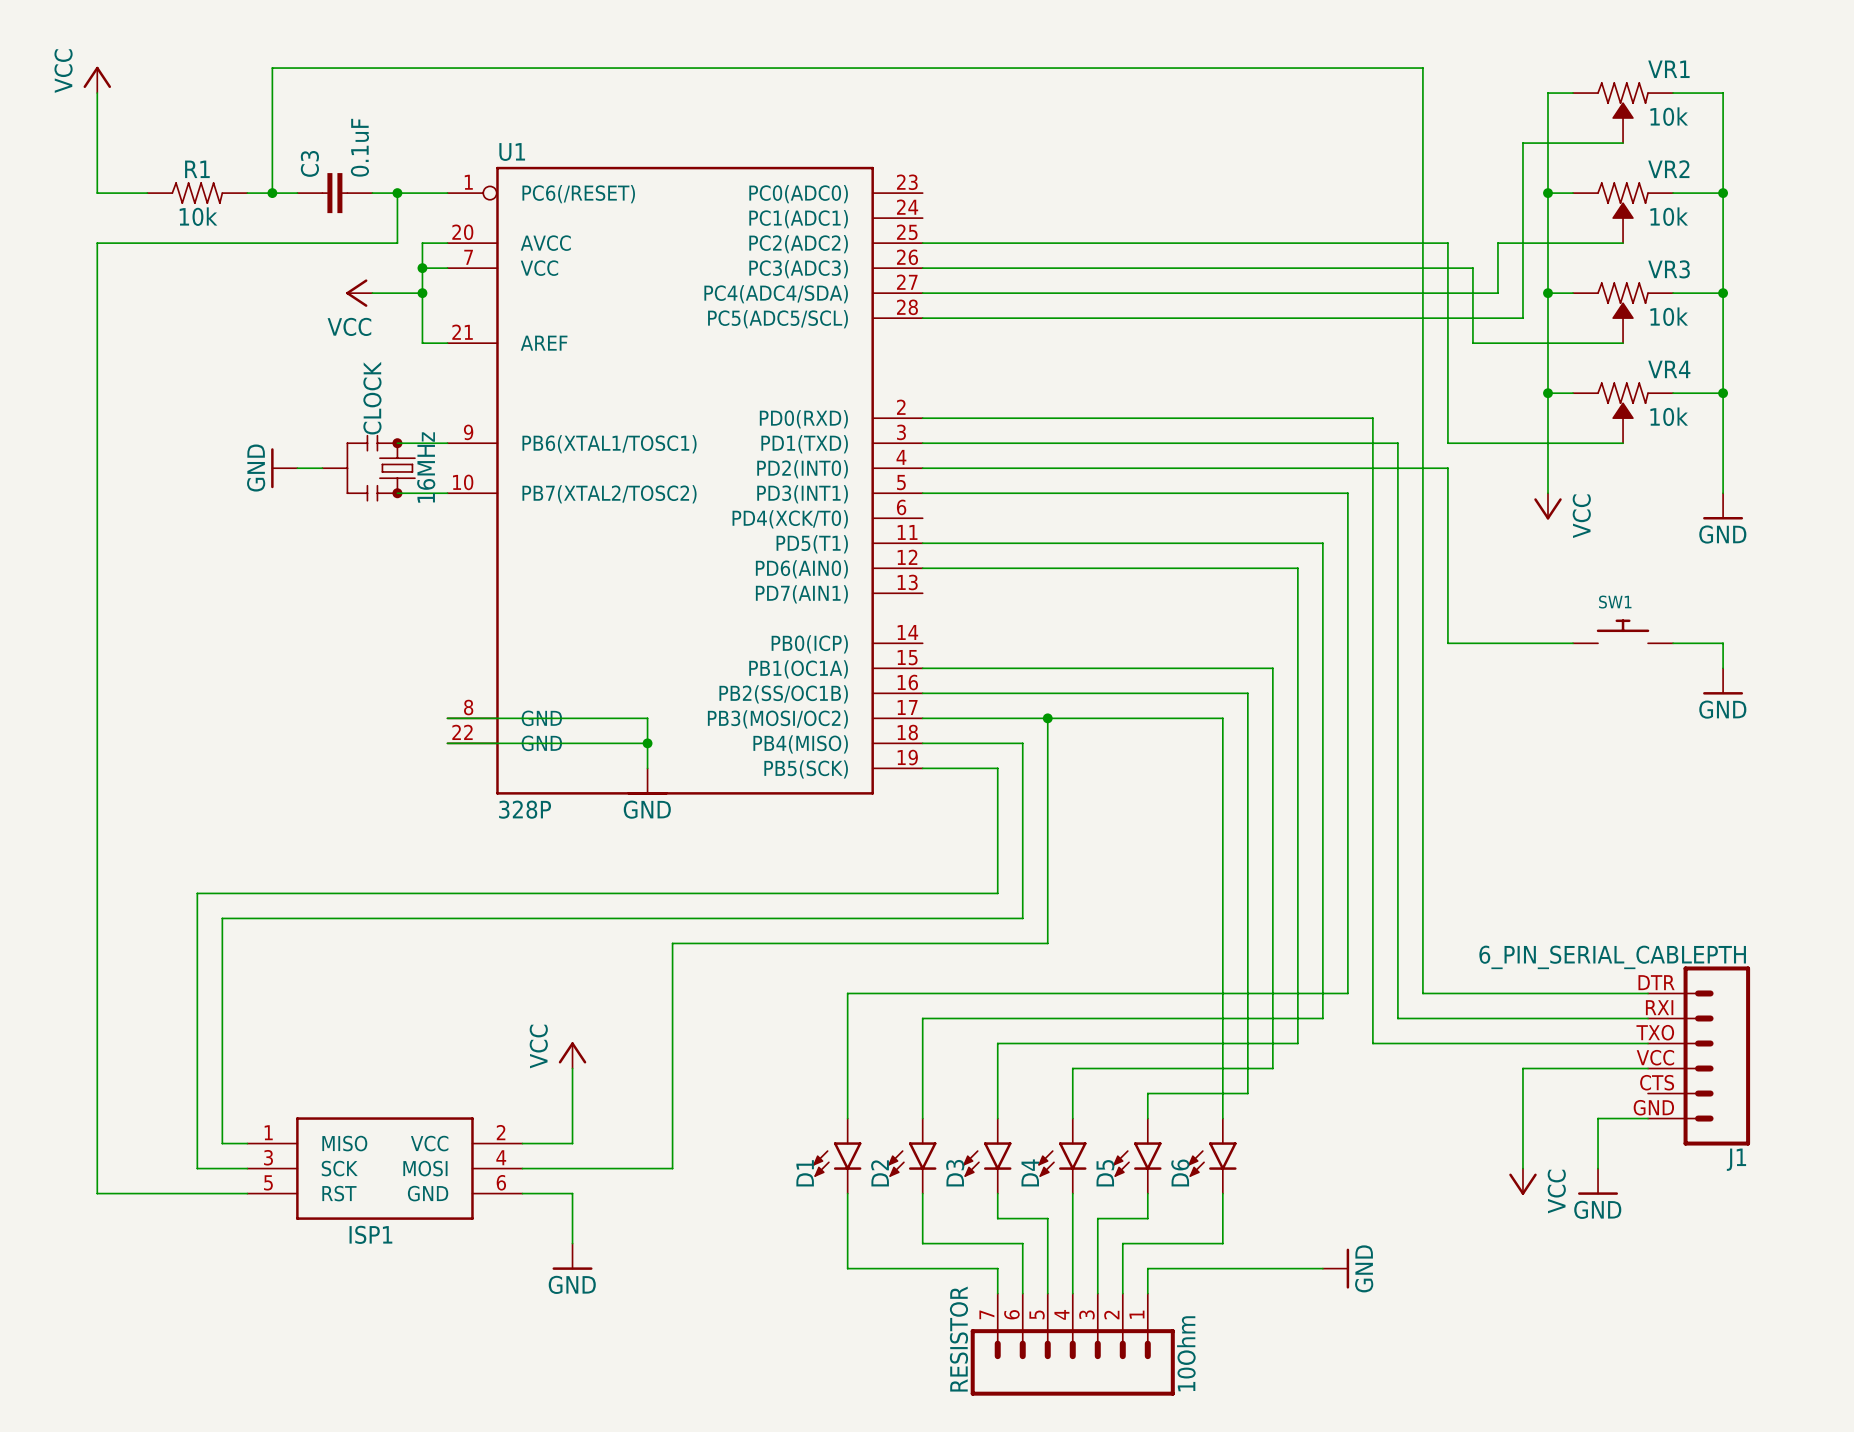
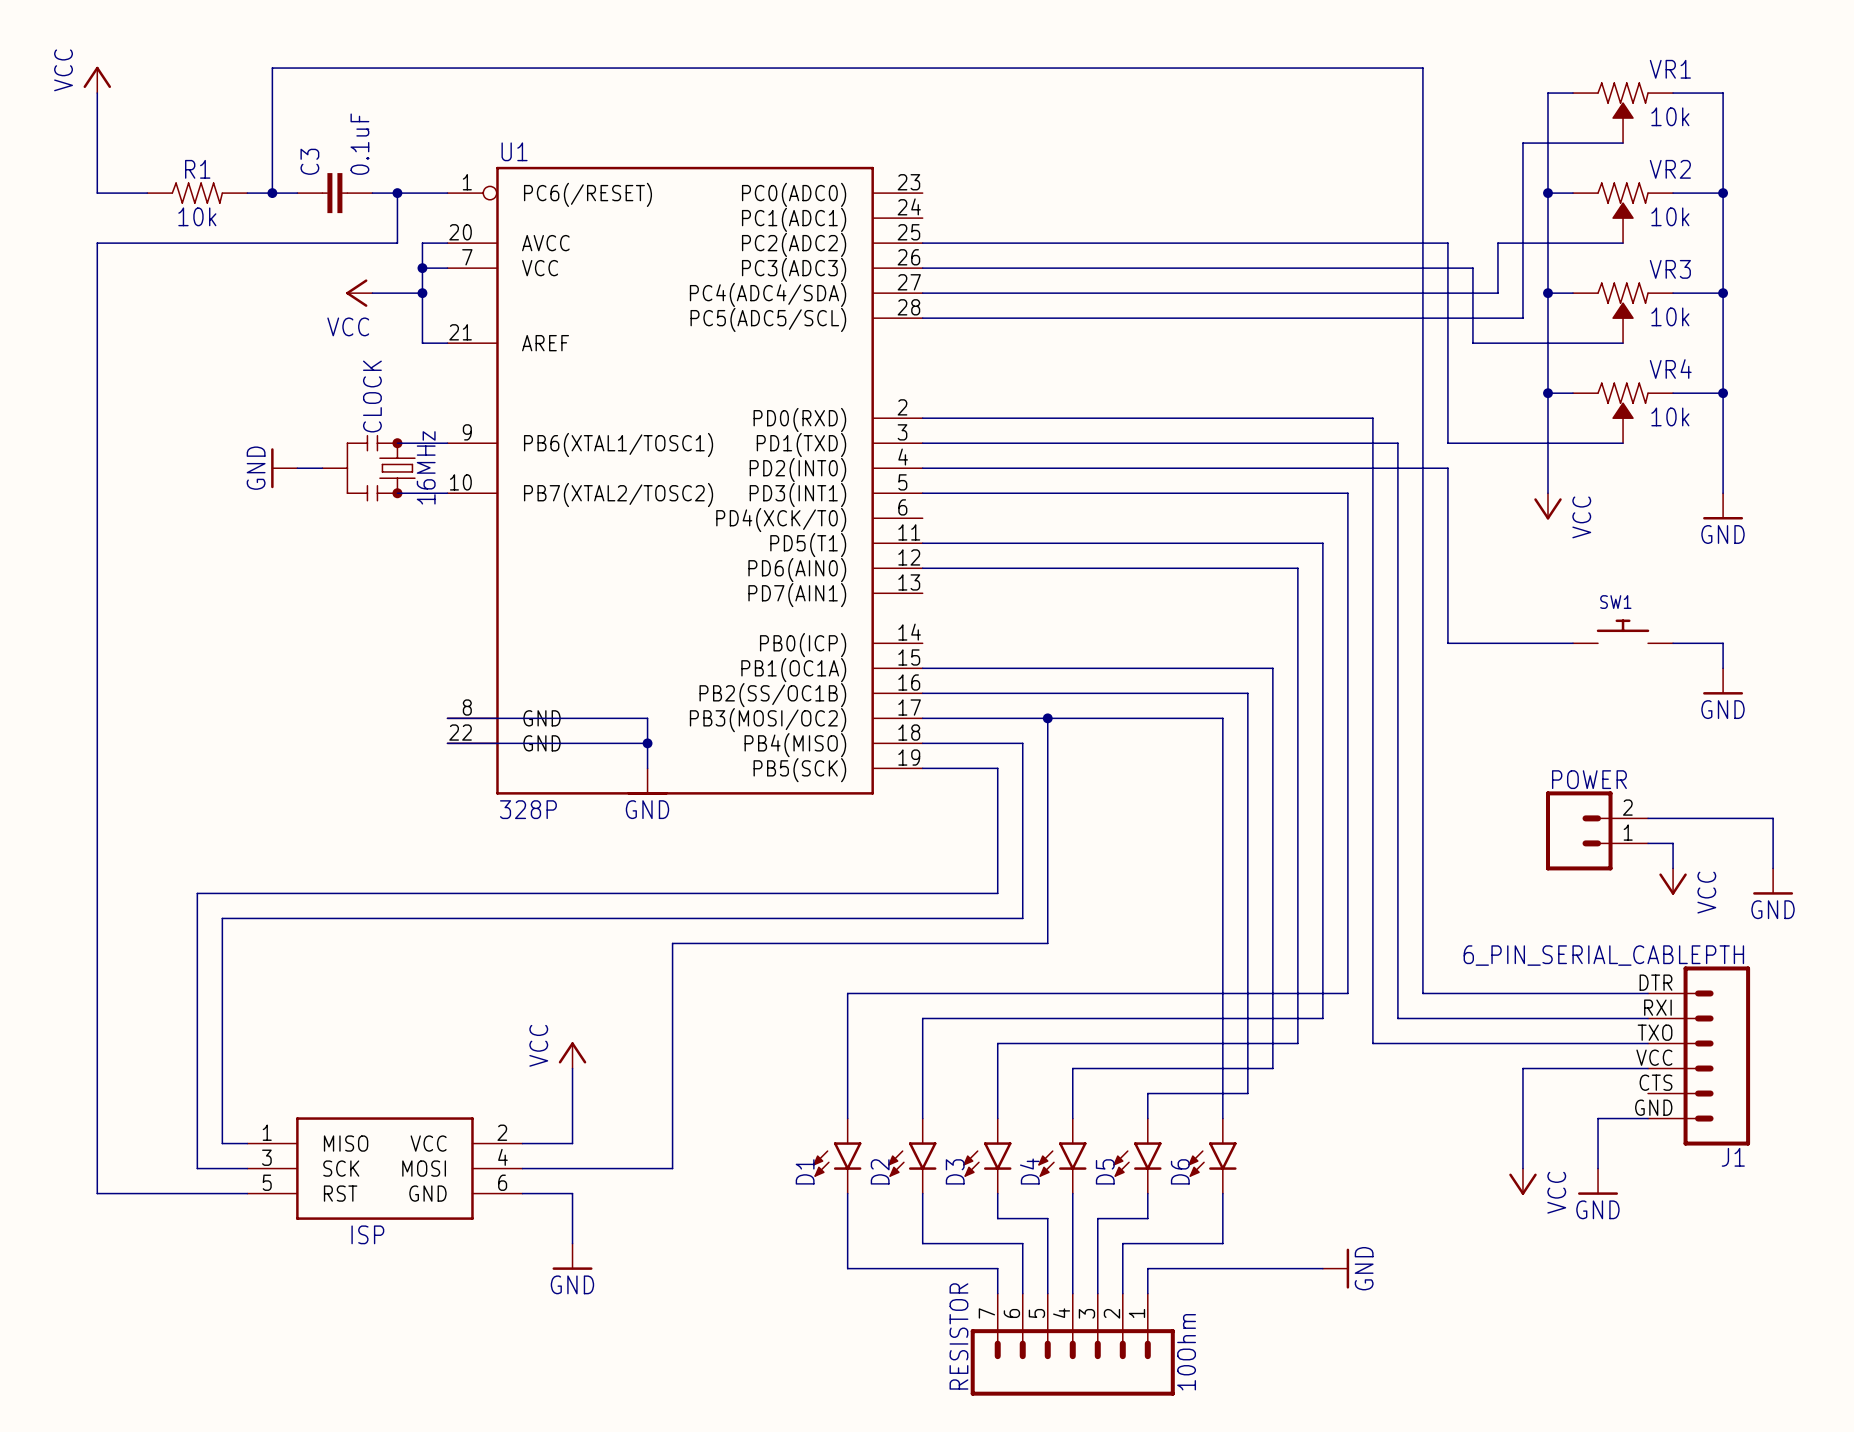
wire: none -> (1648, 818) (1773, 818) (1773, 868)
POWER: none -> (1597, 830)
wire: none -> (1648, 843) (1673, 843) (1673, 868)
power symbol: none -> VCC (1673, 881)
power symbol: none -> GND (1773, 881)
ISP1 name: ISP1 (370, 1234) -> ISP (367, 1234)

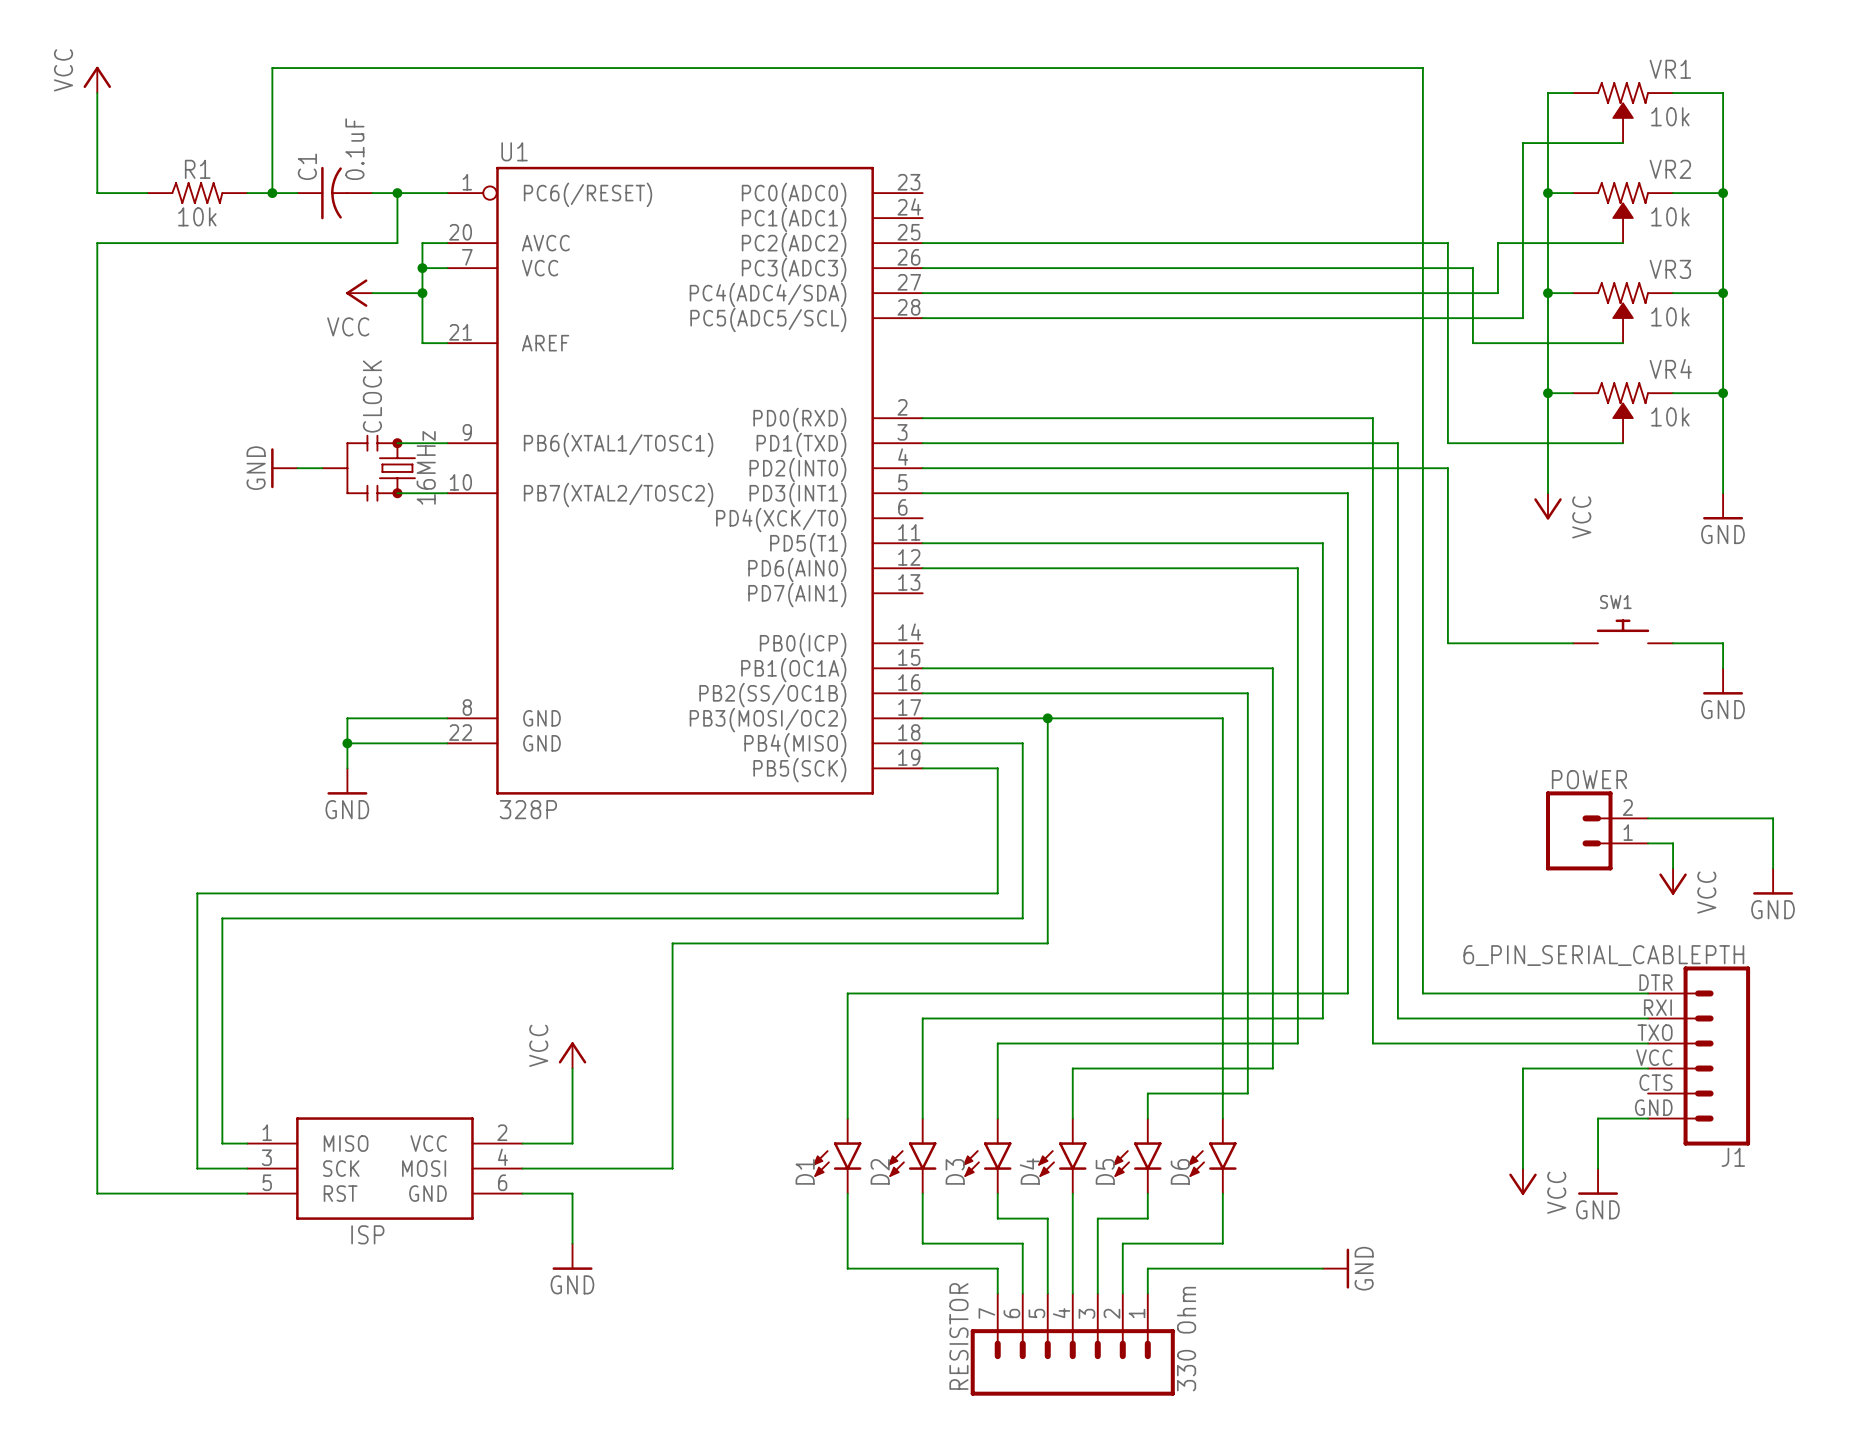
C3: 0.1uF (334, 193) -> none
C1: none -> 0.1uF (334, 193)
wire: (447, 718) (647, 718) (647, 768) -> (447, 718) (347, 718) (347, 768)
junction: none -> (347, 743)
wire: (447, 743) (647, 743) -> (447, 743) (347, 743)
junction: (647, 743) -> none
power symbol: none -> GND (347, 781)
power symbol: GND (647, 781) -> none
RESISTOR value: 10Ohm (1186, 1352) -> 330 Ohm (1186, 1339)

